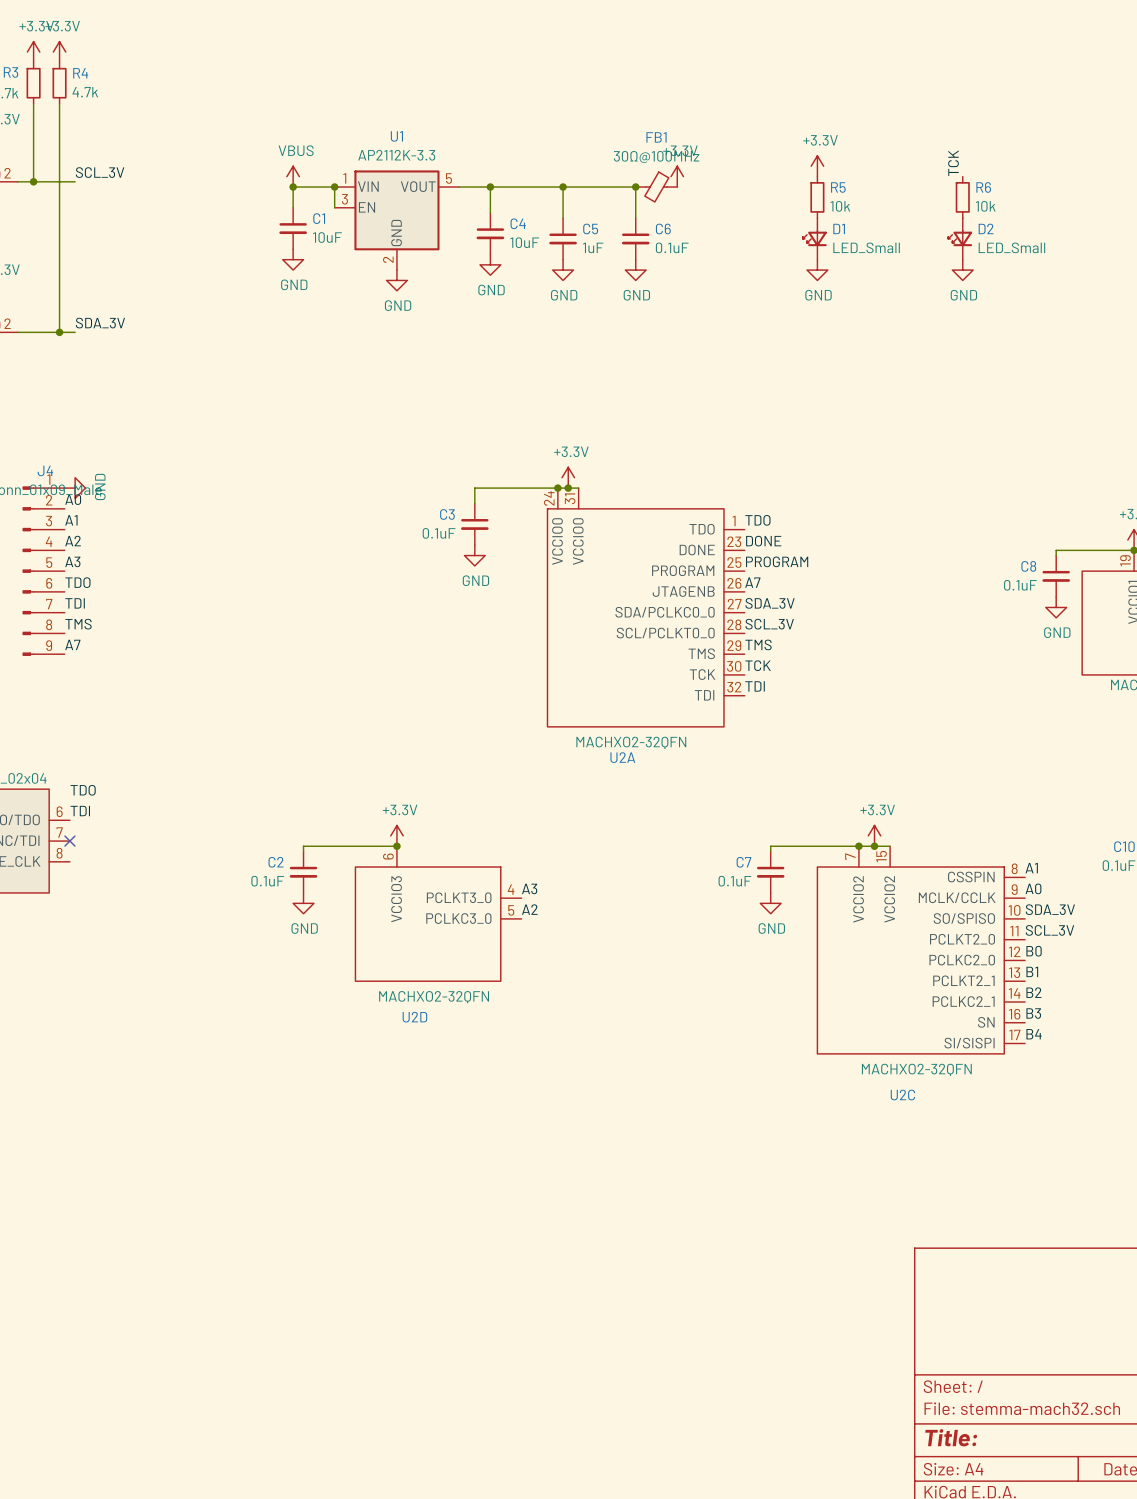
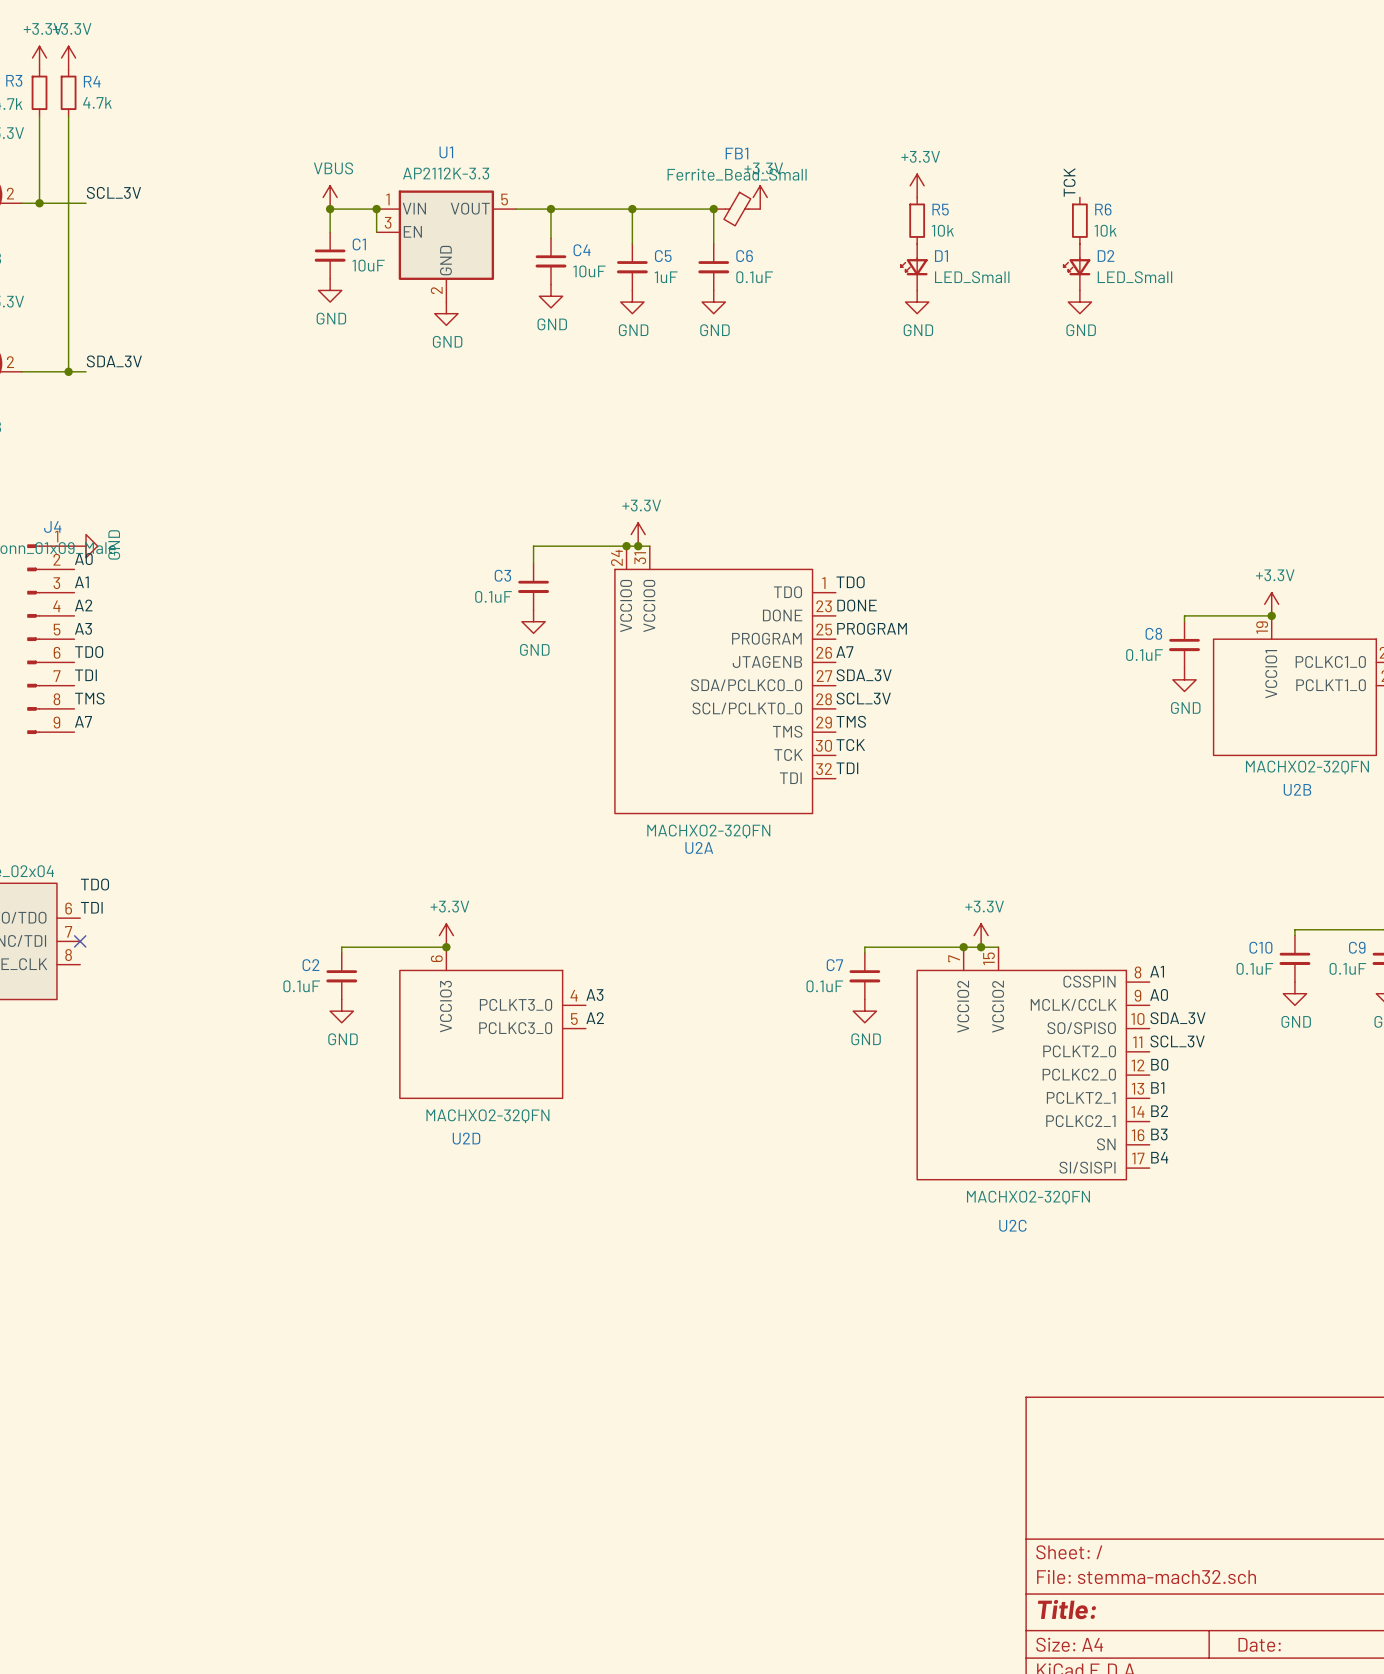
FB1 value: 30Ω@100MHz (656, 156) -> Ferrite_Bead_Small (737, 174)

